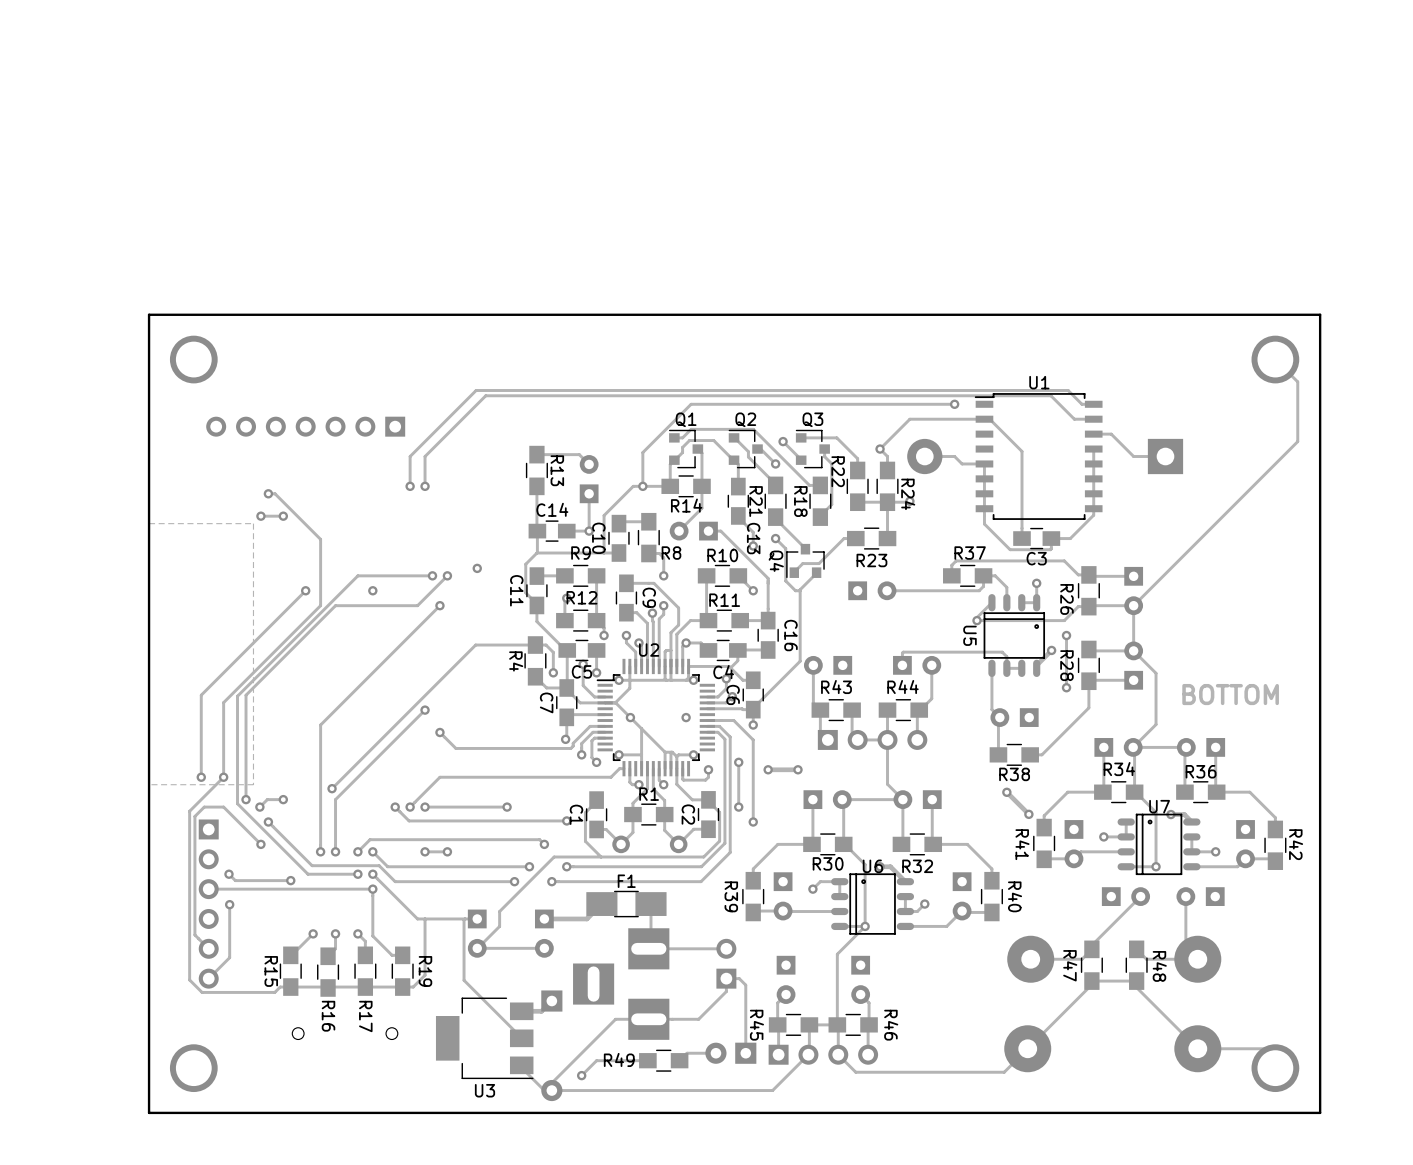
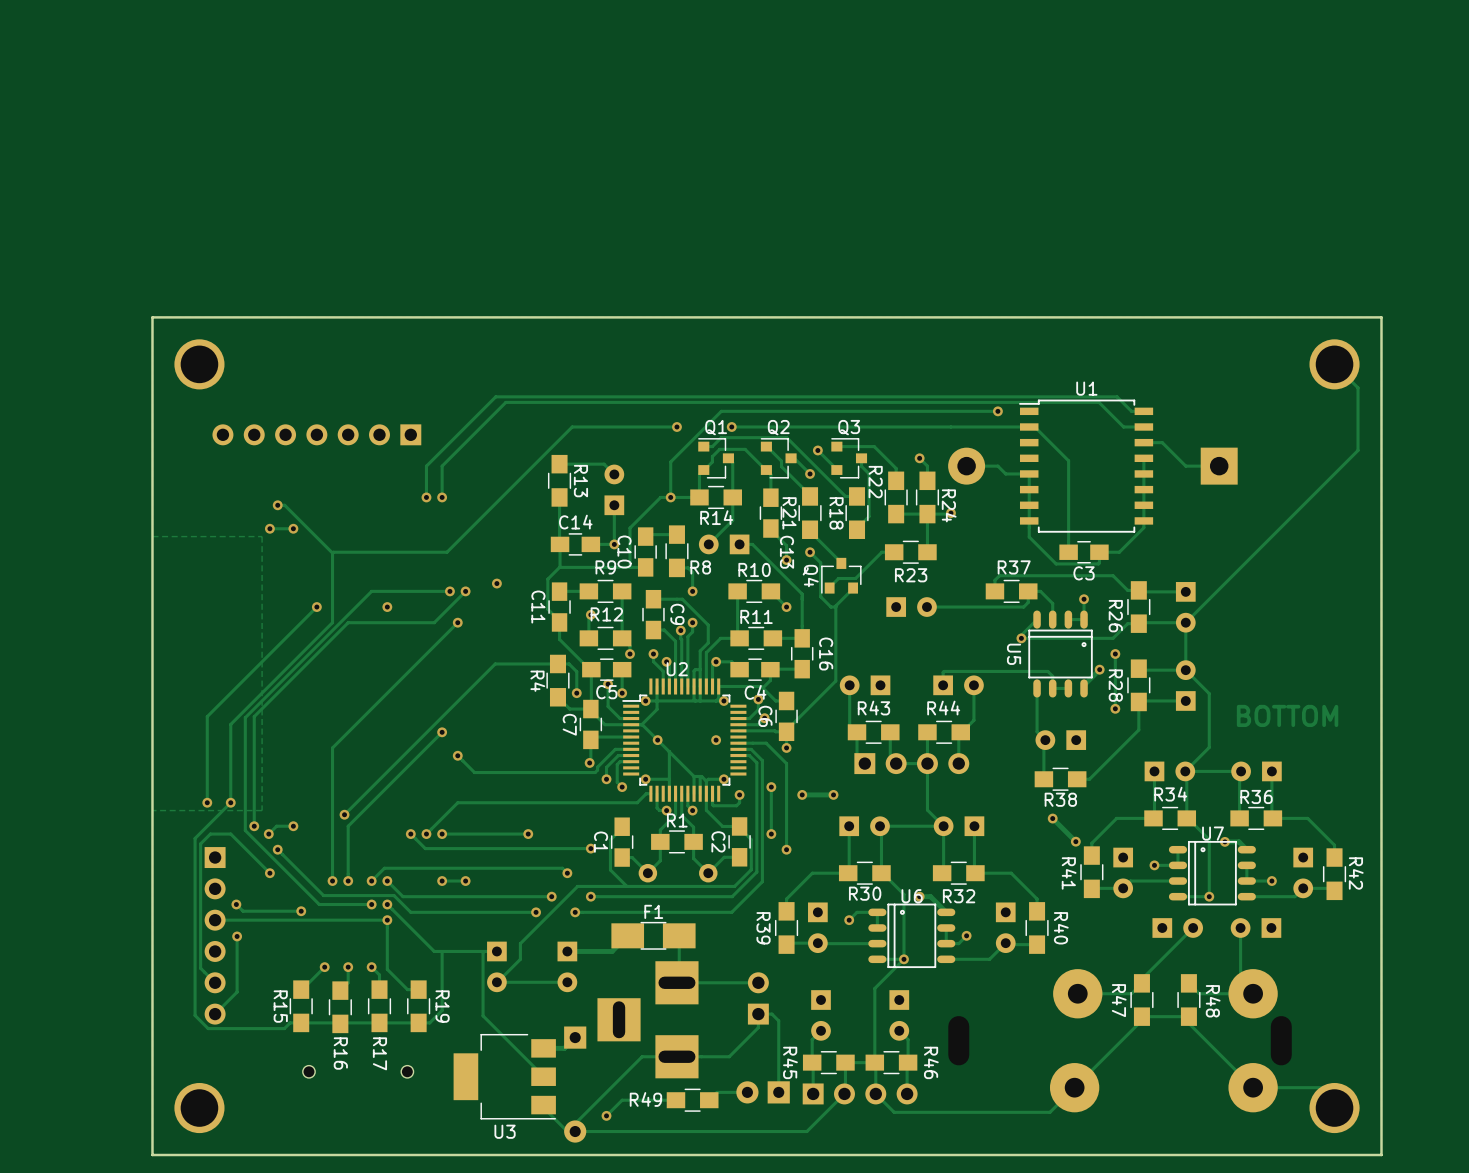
track: none -> (676, 426) (572, 426) (446, 552) (332, 553)
via: none -> (676, 426)
via: none -> (731, 426)
track: (909, 419) (880, 449) -> (950, 426) (731, 426)

